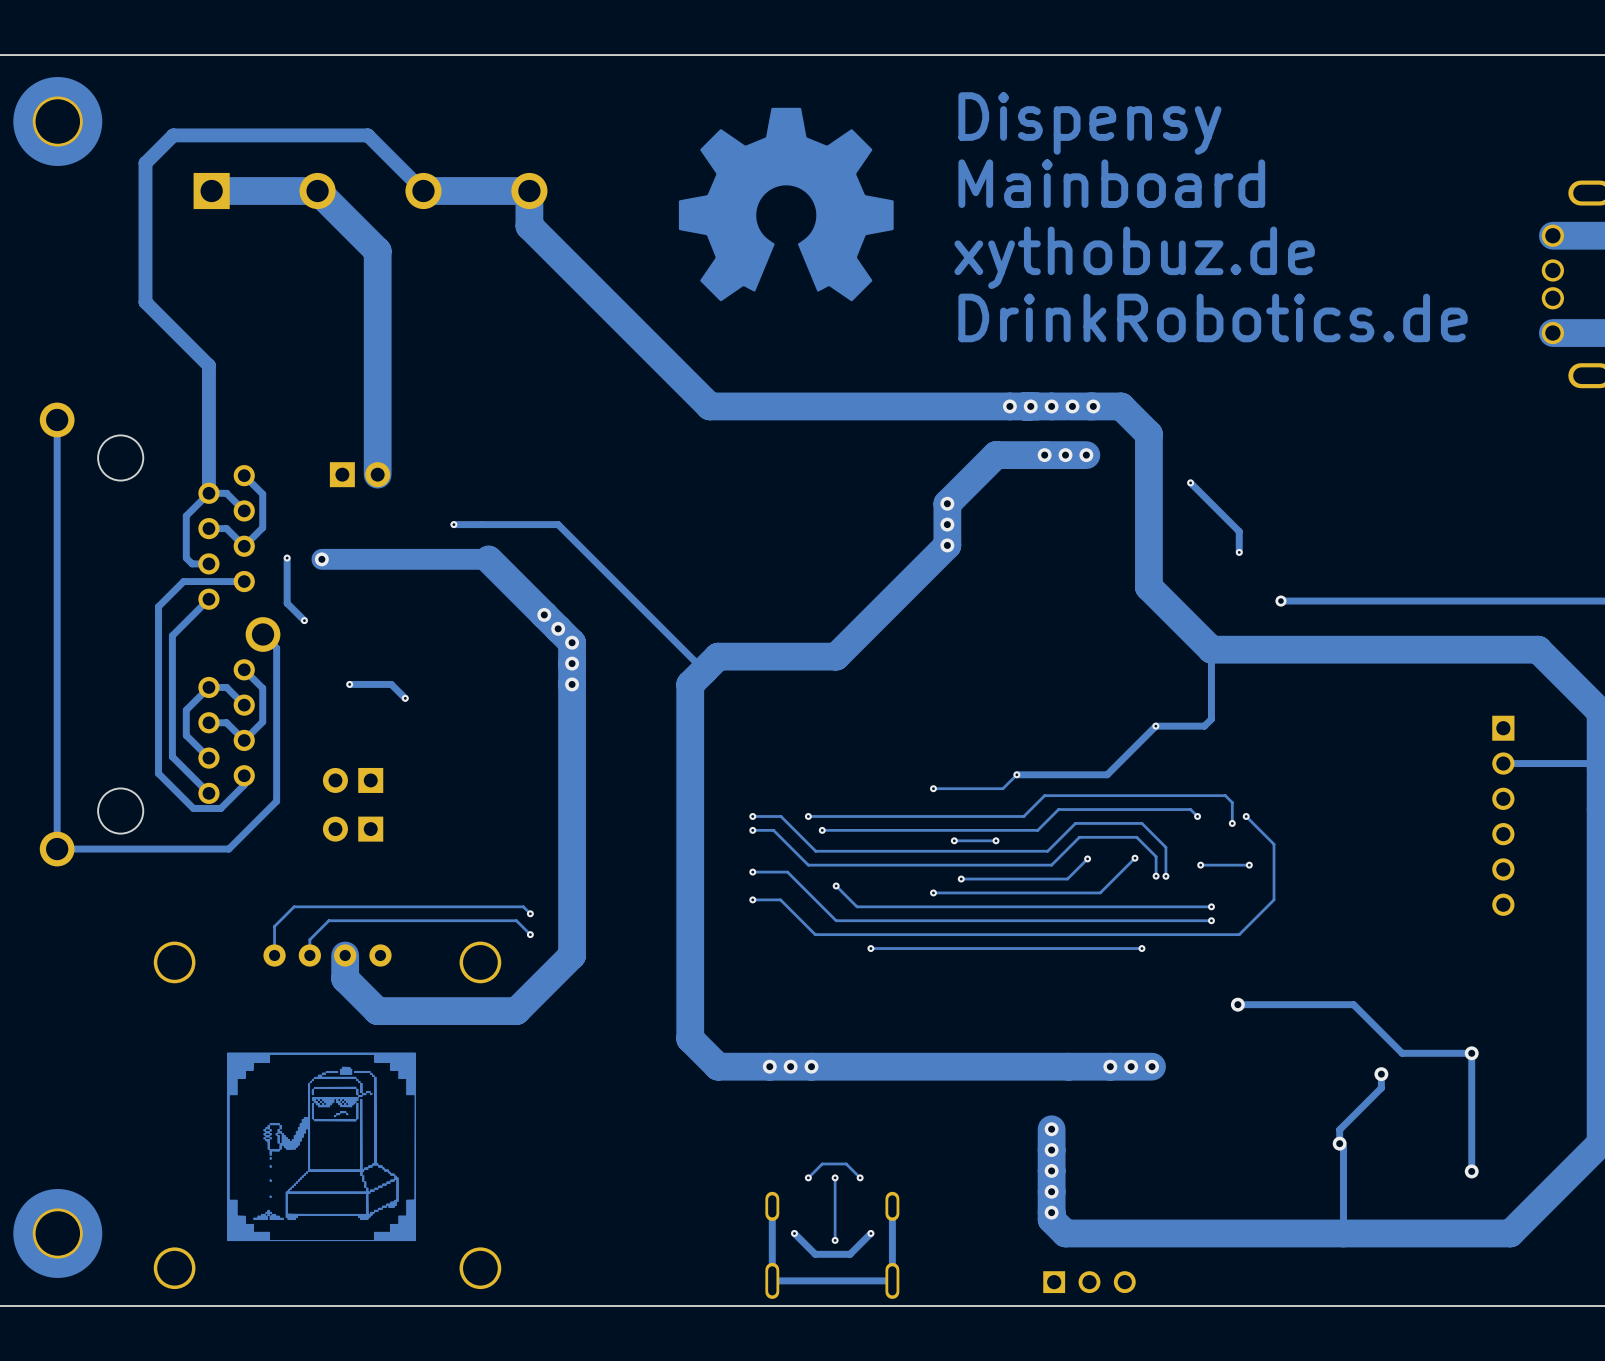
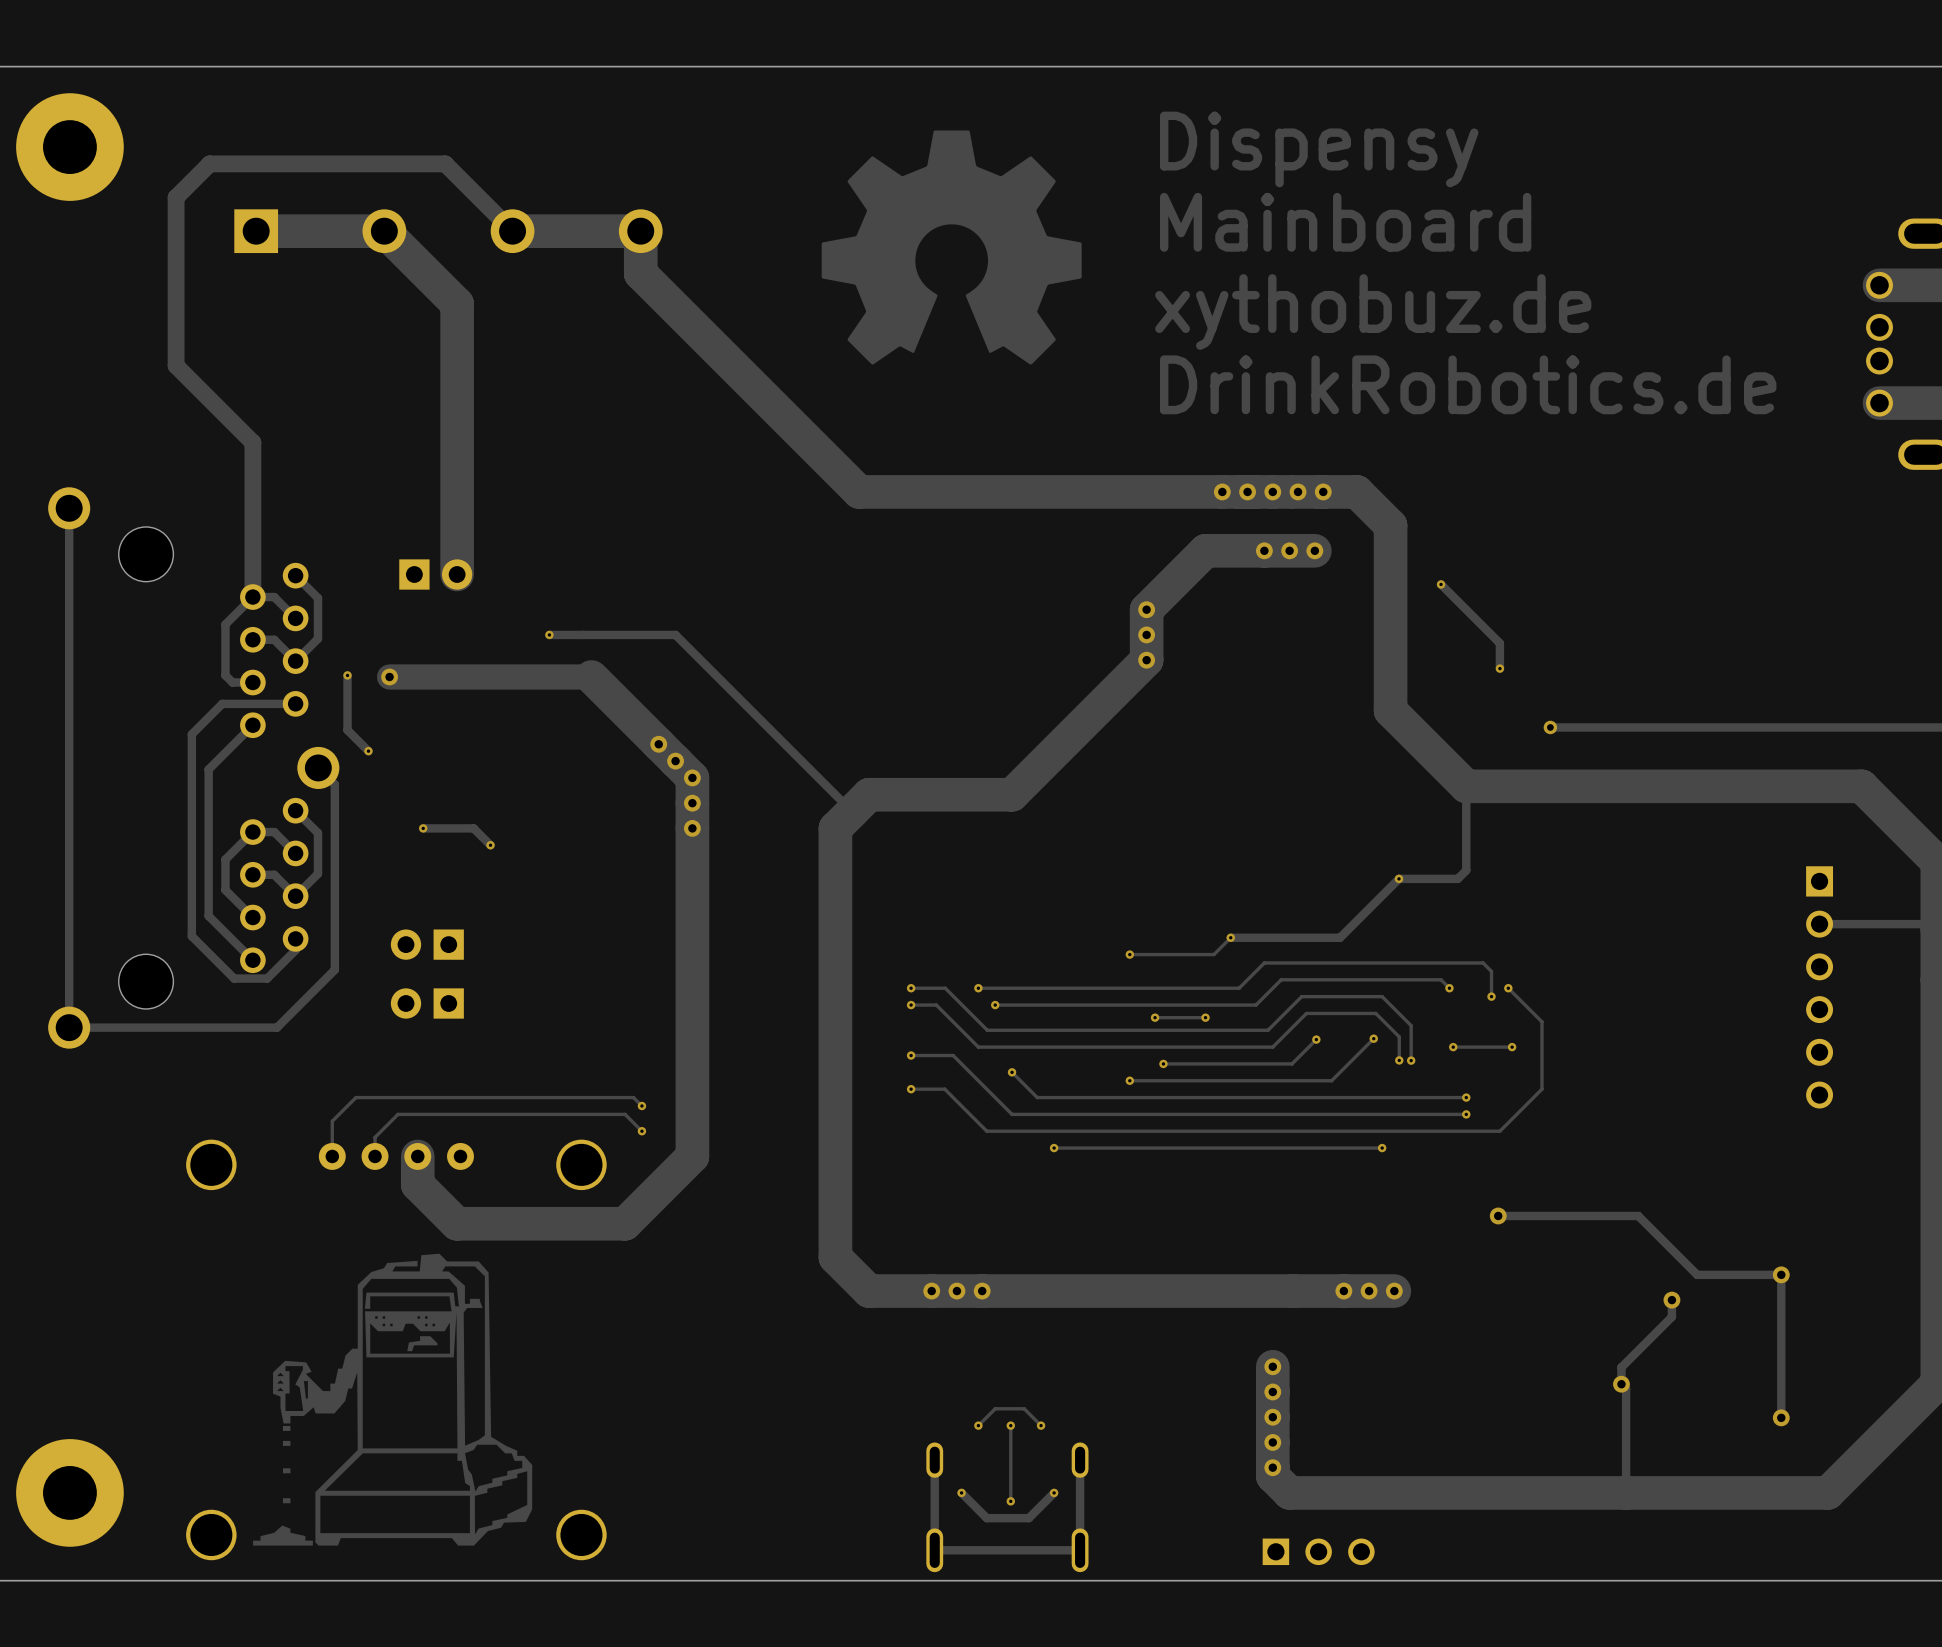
drawing: none -> [253, 1253, 533, 1546]
drawing: [227, 1052, 416, 1242] -> none
drawing shape: [334, 1111, 349, 1118] -> [407, 1336, 438, 1352]

